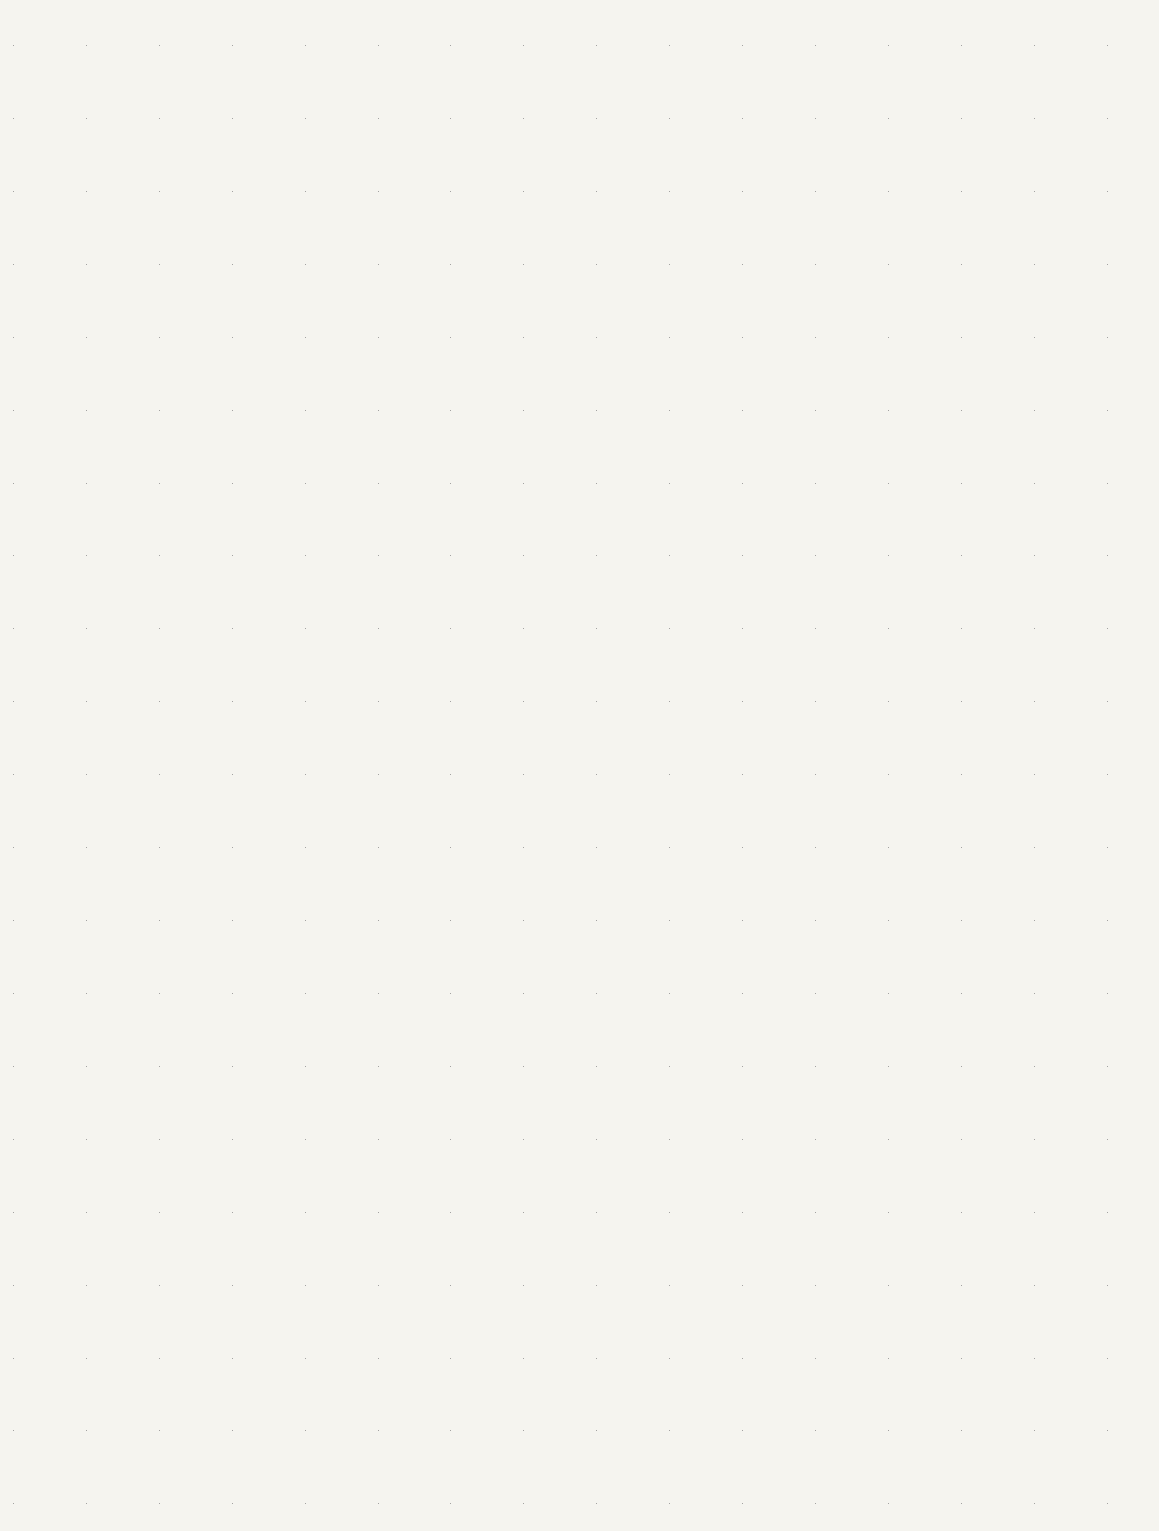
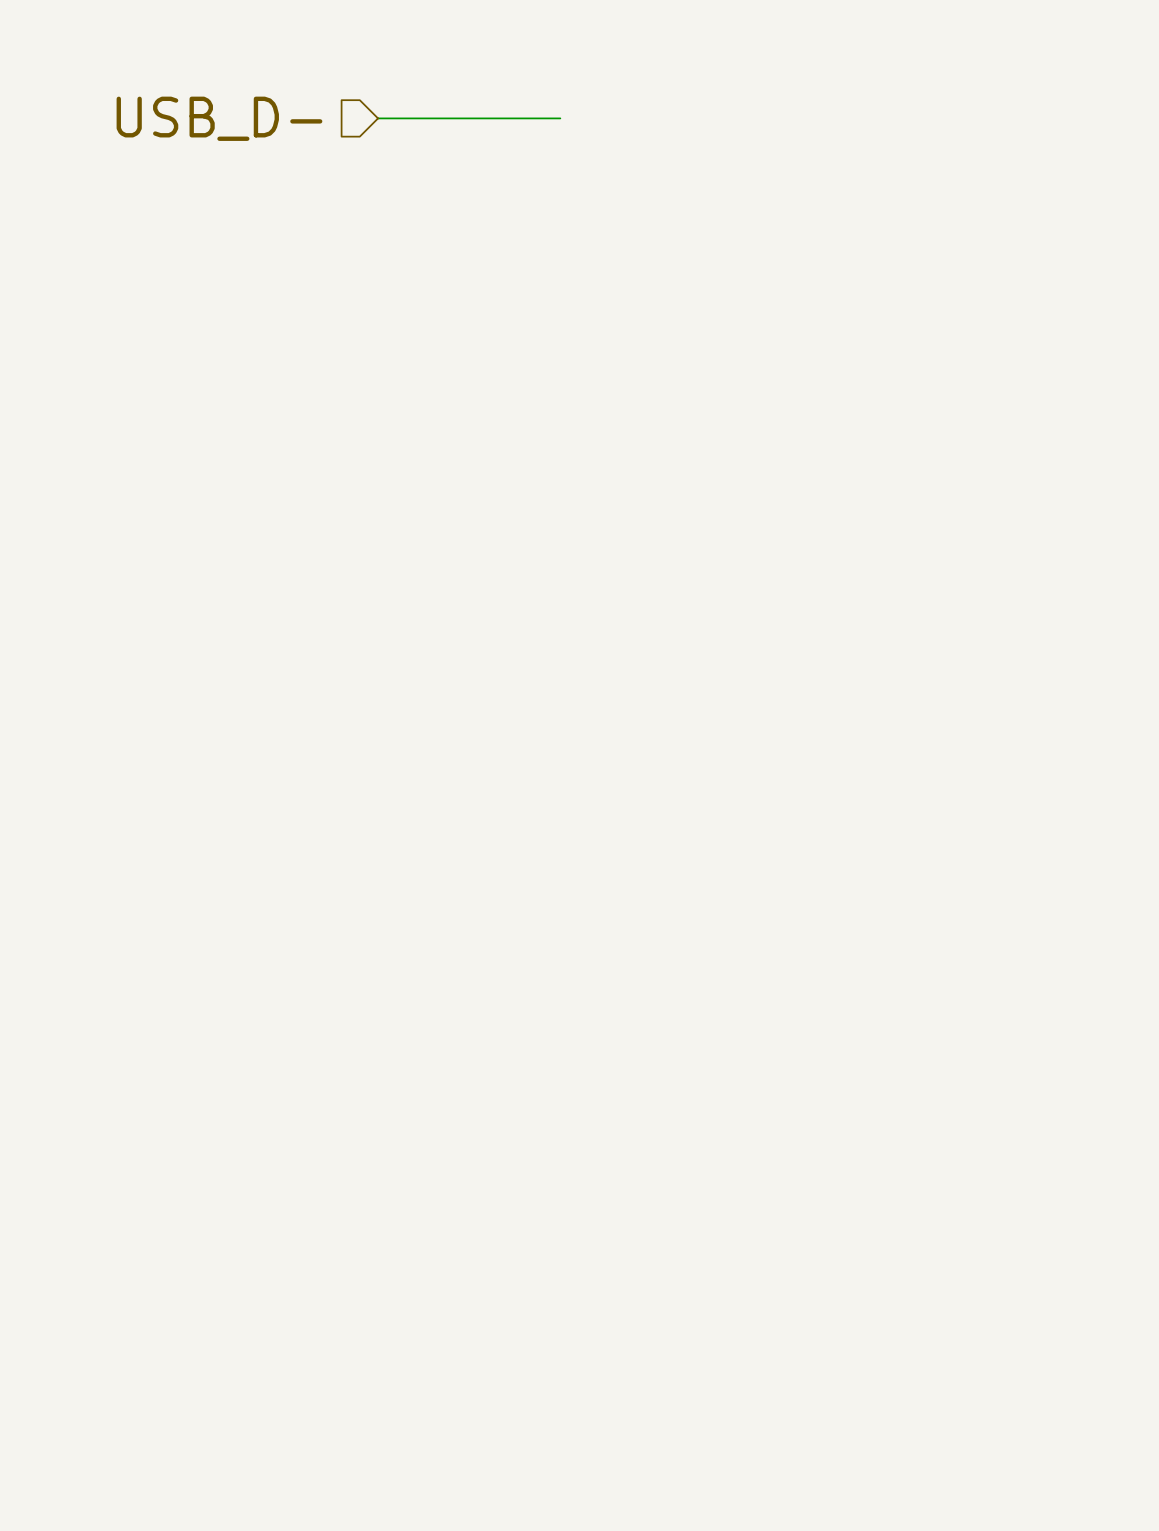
hierarchical label: none -> USB_D- (219, 118)
wire: none -> (378, 118) (560, 118)

